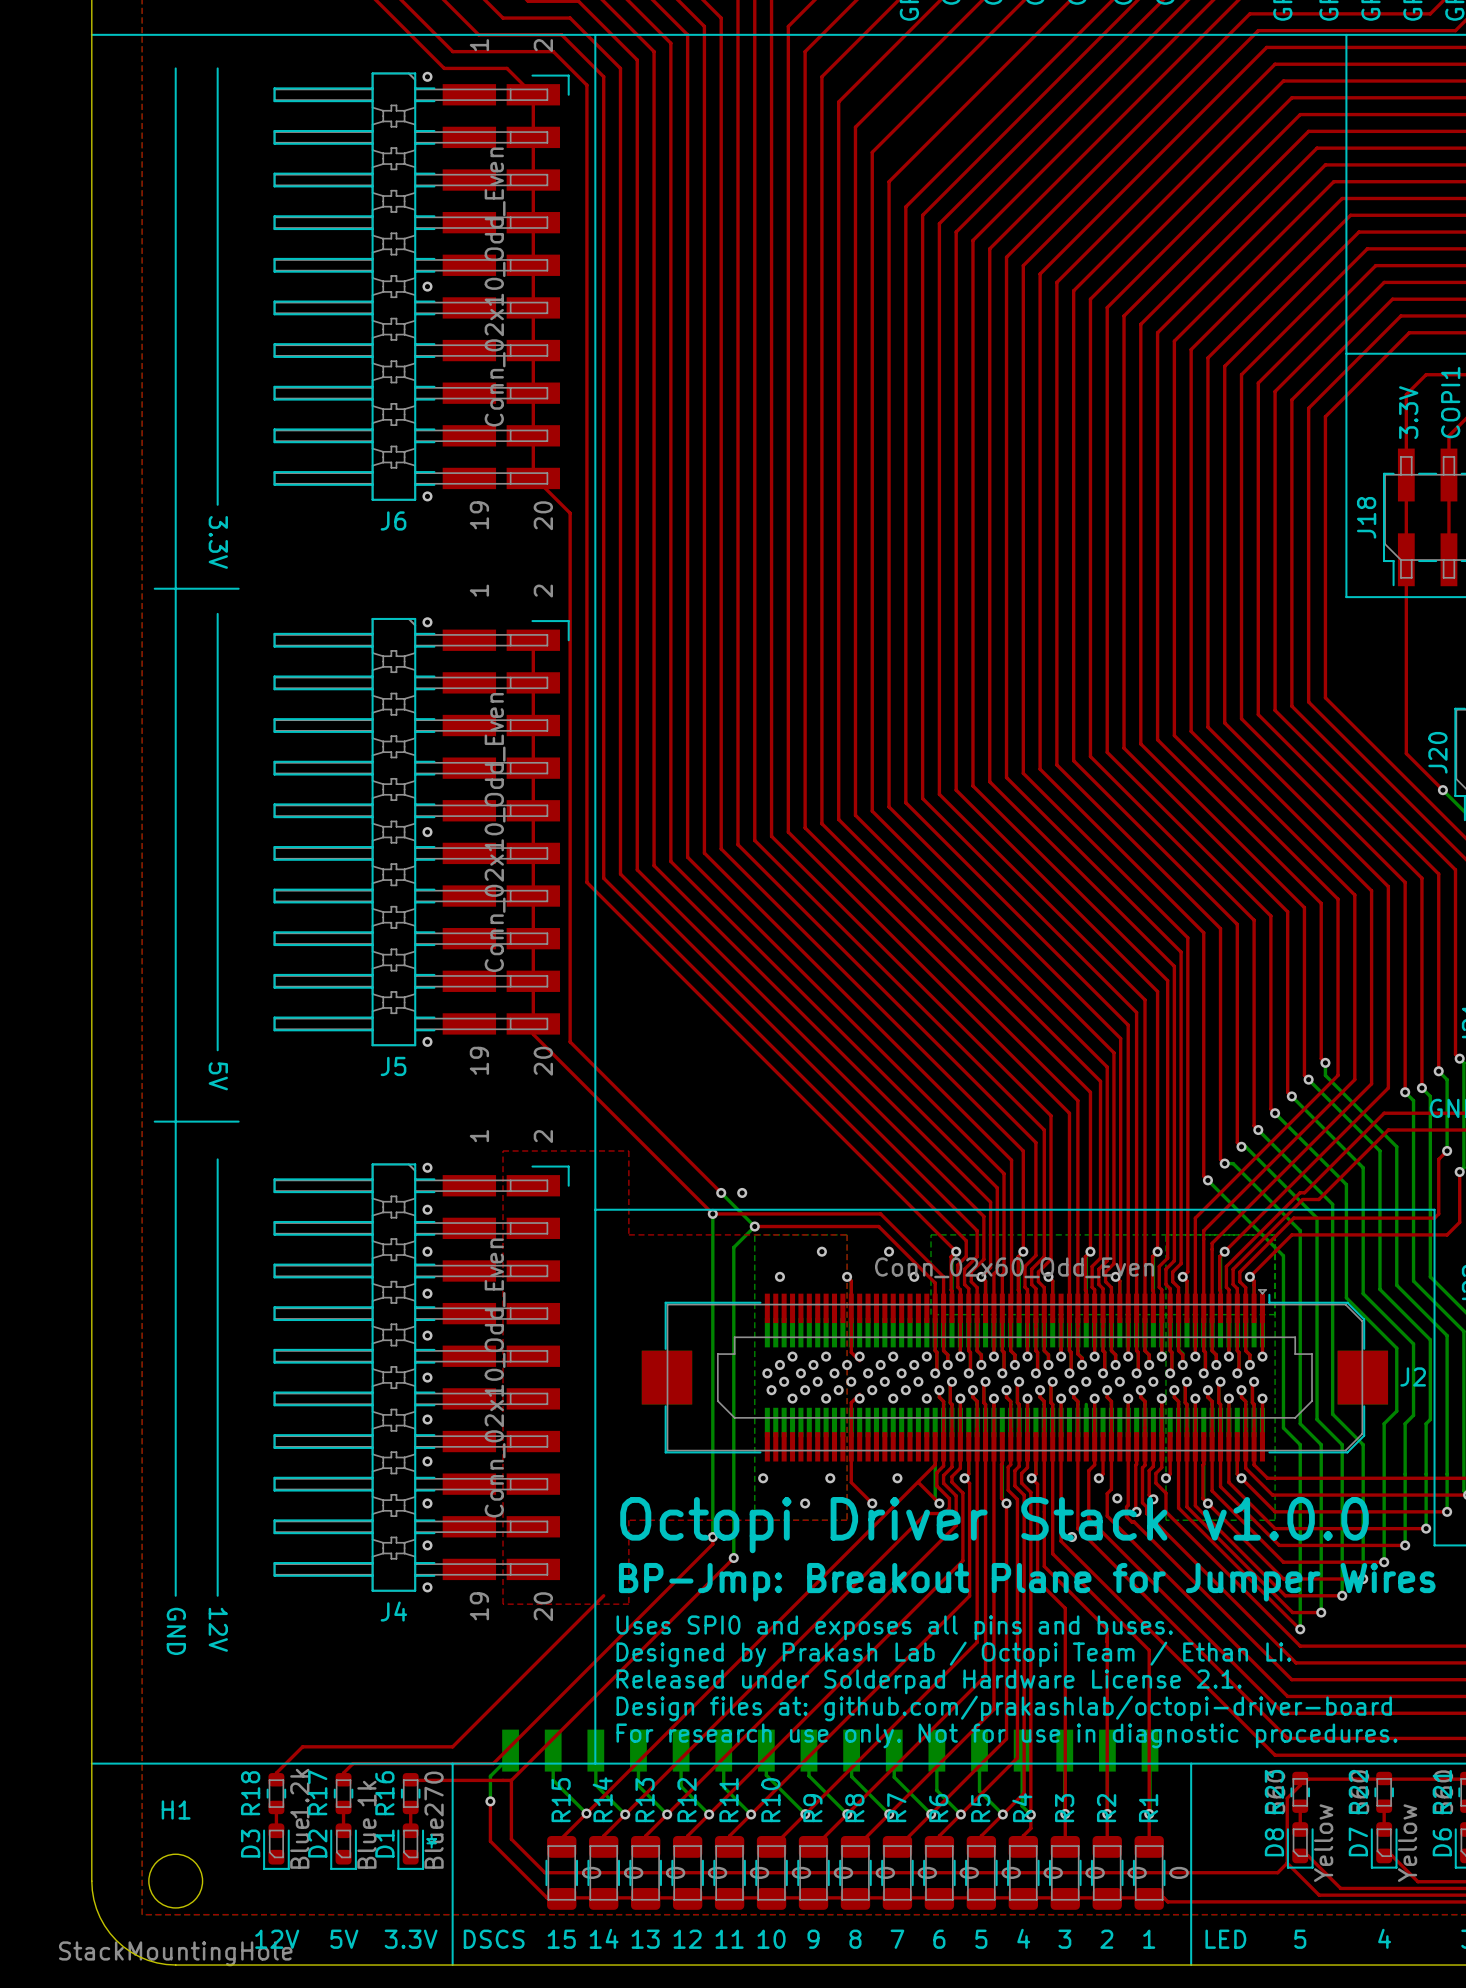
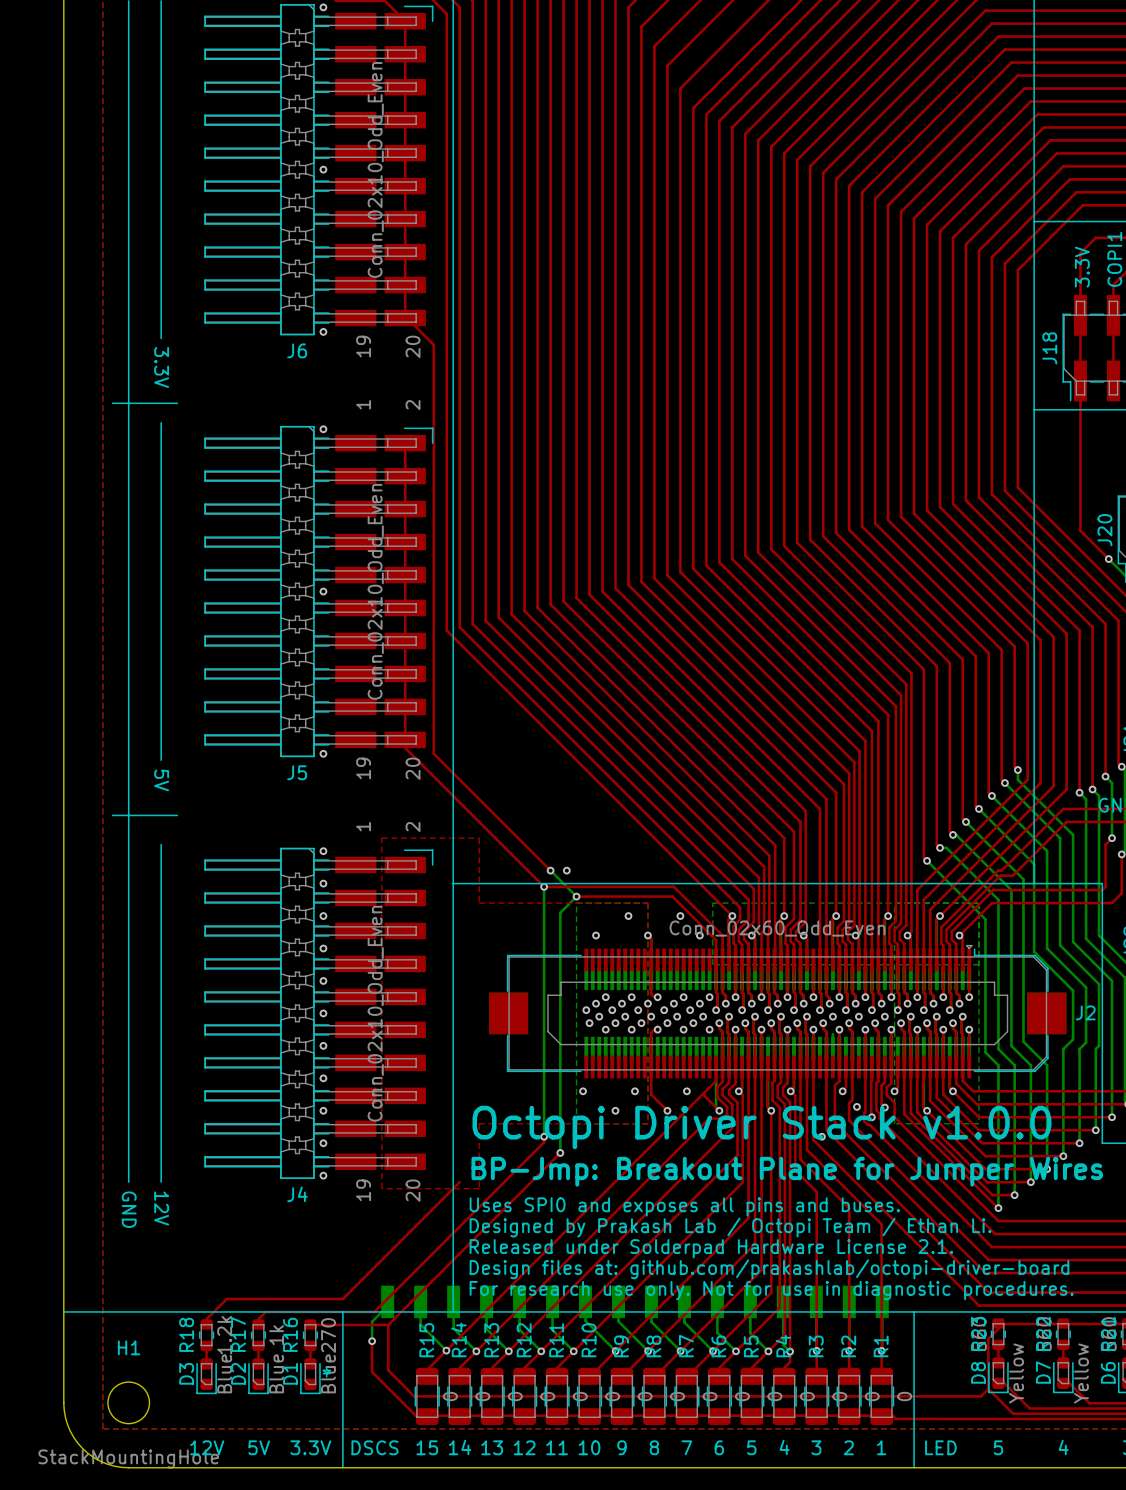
line: none -> (1034, 409) (1034, 883)

